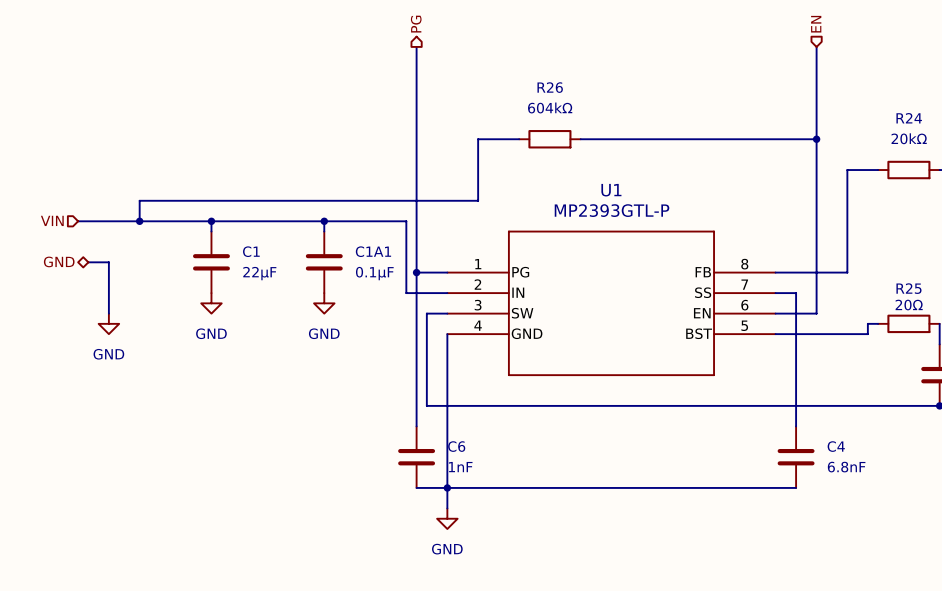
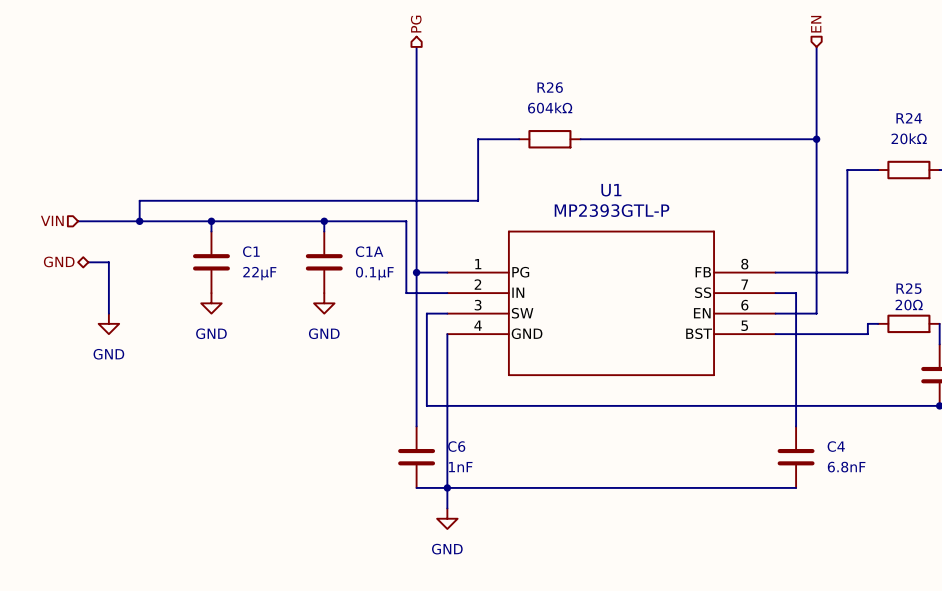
C1A1 name: C1A1 (373, 251) -> C1A (369, 251)

